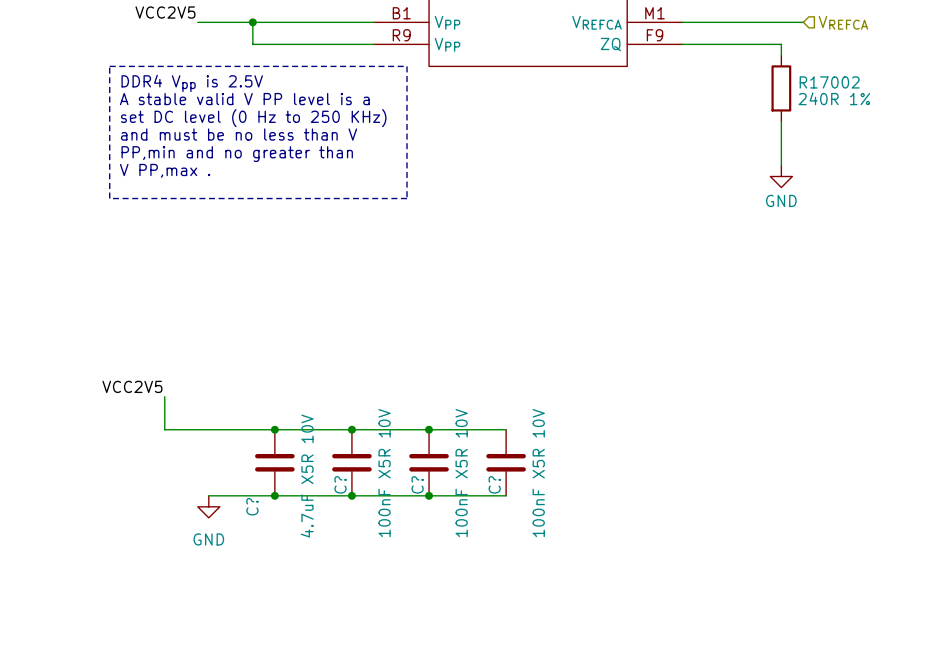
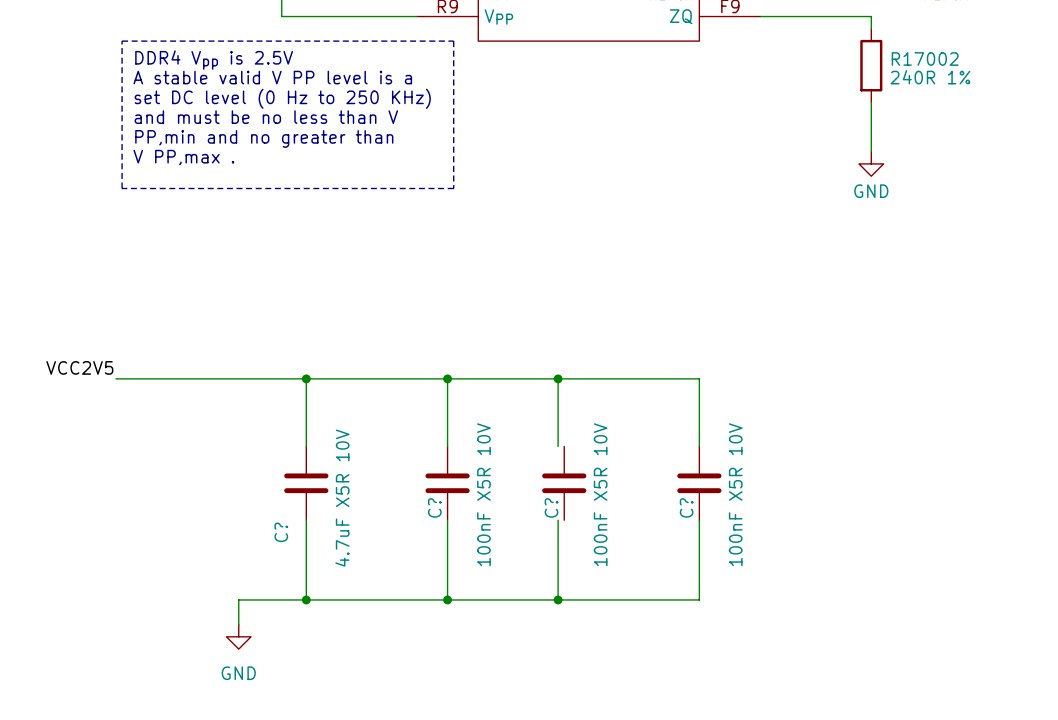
wire: none -> (115, 378) (699, 378) (699, 446)
wire: none -> (306, 378) (306, 446)
junction: none -> (306, 378)
wire: none -> (447, 378) (447, 446)
junction: none -> (447, 378)
wire: none -> (558, 378) (558, 446)
junction: none -> (558, 378)
label position: VCC2V5 (132, 386) -> VCC2V5 (79, 367)
wire: (164, 396) (164, 429) (506, 429) -> none
junction: (274, 429) -> none
junction: (351, 429) -> none
junction: (429, 429) -> none
C?: 100nF X5R 10V (351, 462) -> none
C?: none -> 100nF X5R 10V (447, 483)
C?: 100nF X5R 10V (429, 462) -> none
C?: none -> 100nF X5R 10V (699, 483)
wire: (208, 495) (506, 495) -> none
wire: none -> (306, 520) (306, 599)
junction: (274, 495) -> none
junction: (351, 495) -> none
wire: none -> (447, 520) (447, 599)
junction: (429, 495) -> none
wire: none -> (558, 520) (558, 599)
wire: none -> (699, 520) (699, 599) (238, 599) (238, 624)
power symbol position: GND (208, 506) -> GND (238, 636)
junction: none -> (306, 599)
junction: none -> (447, 599)
junction: none -> (558, 599)

